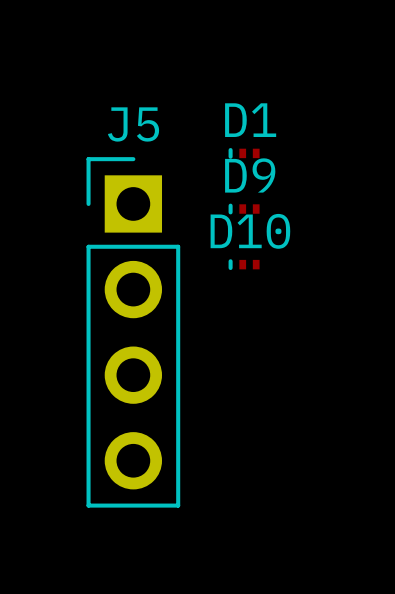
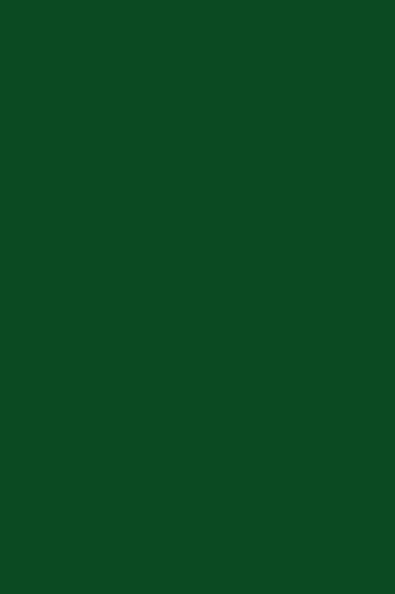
D1: (244, 153) -> none
D9: (244, 209) -> none
D10: (244, 264) -> none
J5: (133, 332) -> none

